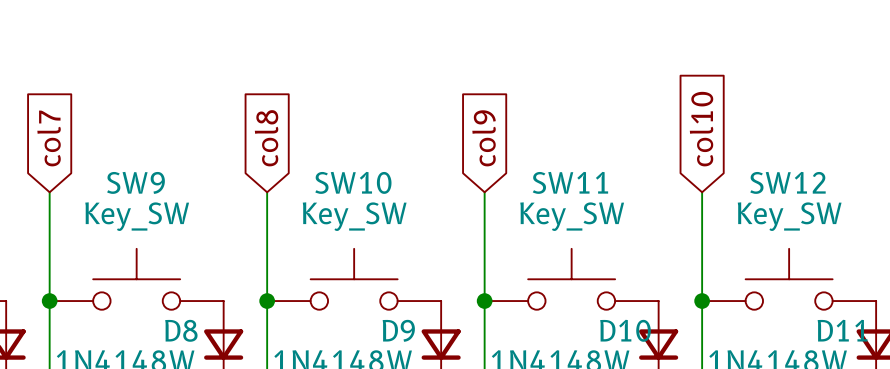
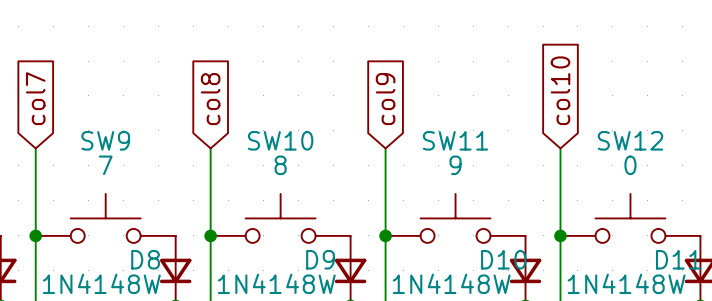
SW9 value: Key_SW (137, 216) -> 7 (105, 165)
SW10 value: Key_SW (354, 216) -> 8 (280, 165)
SW11 value: Key_SW (572, 216) -> 9 (455, 165)
SW12 value: Key_SW (789, 216) -> 0 (630, 165)

